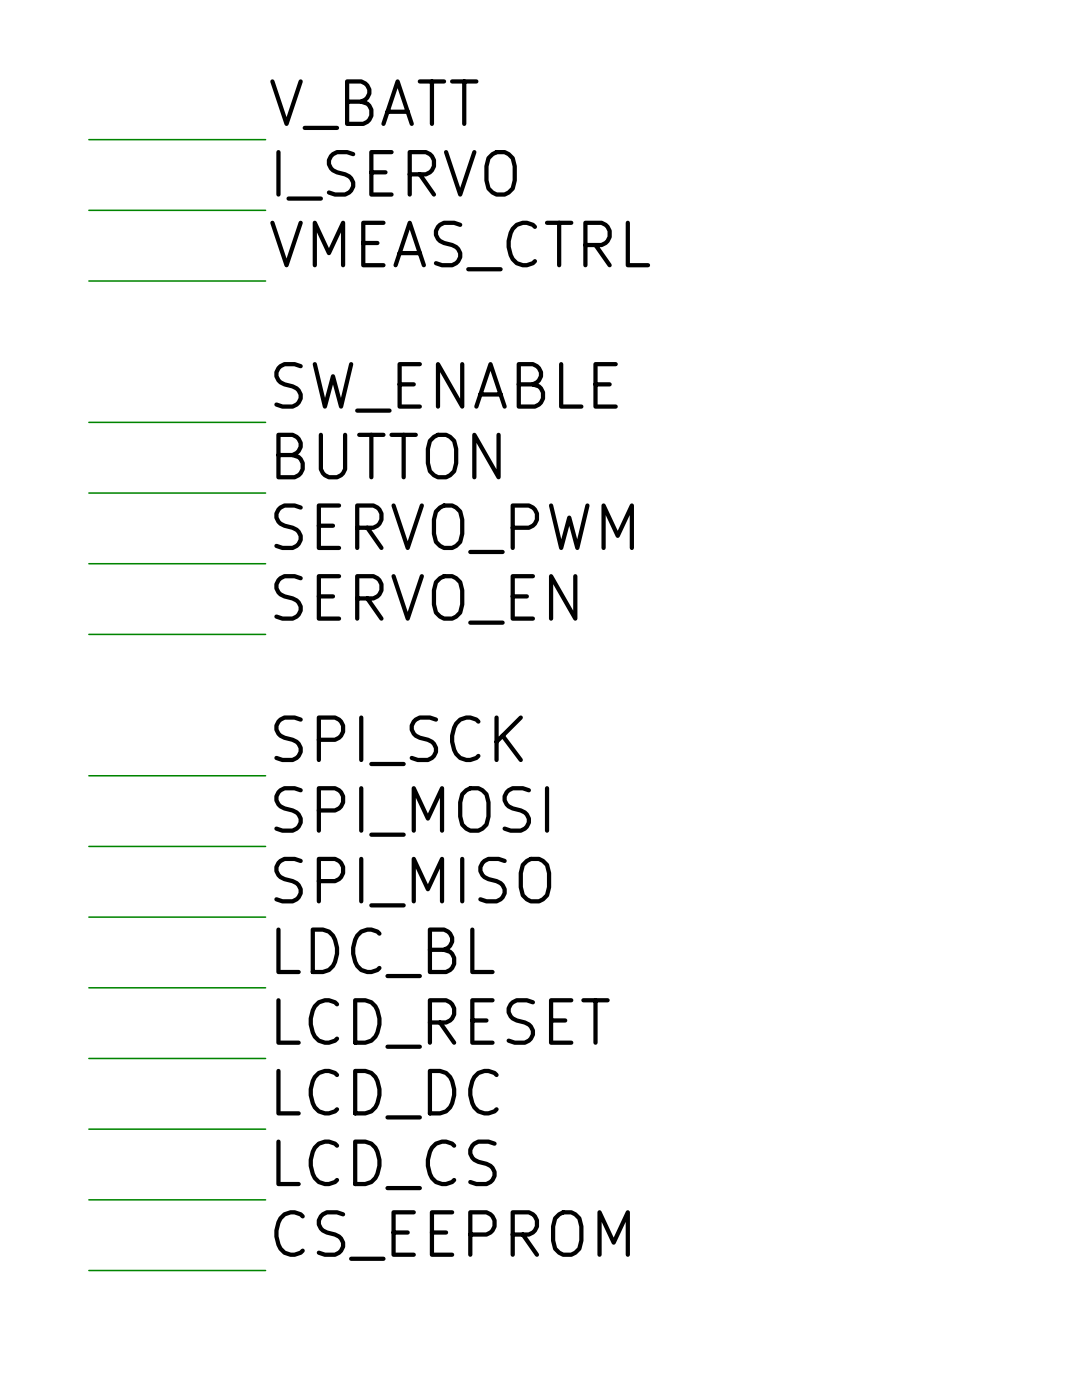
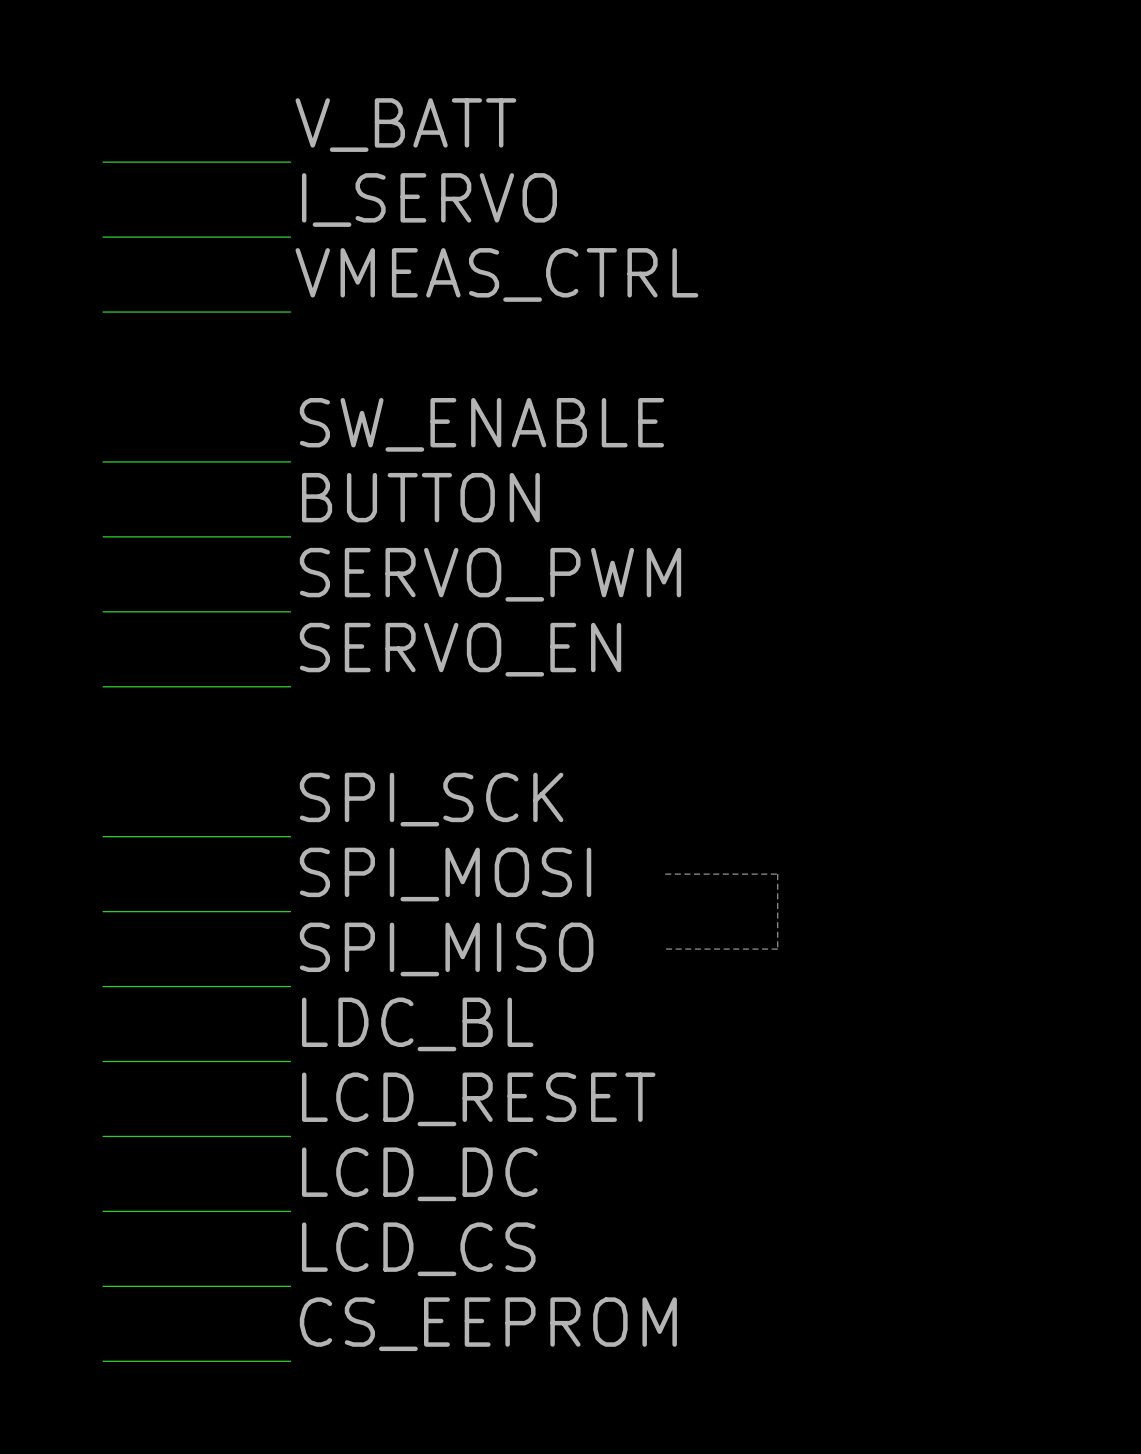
line: none -> (665, 874) (777, 874) (777, 949) (665, 949)

